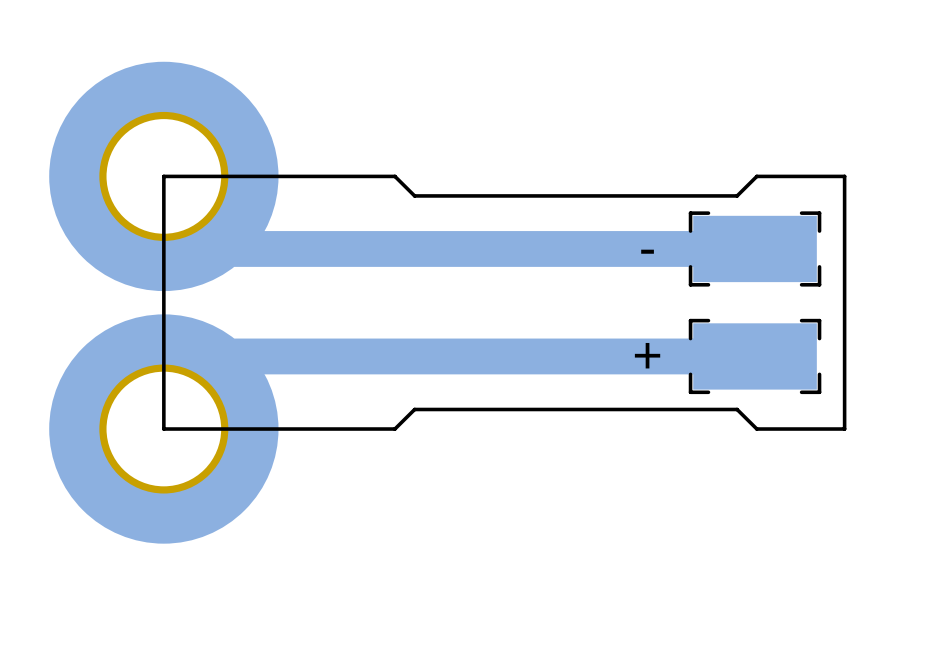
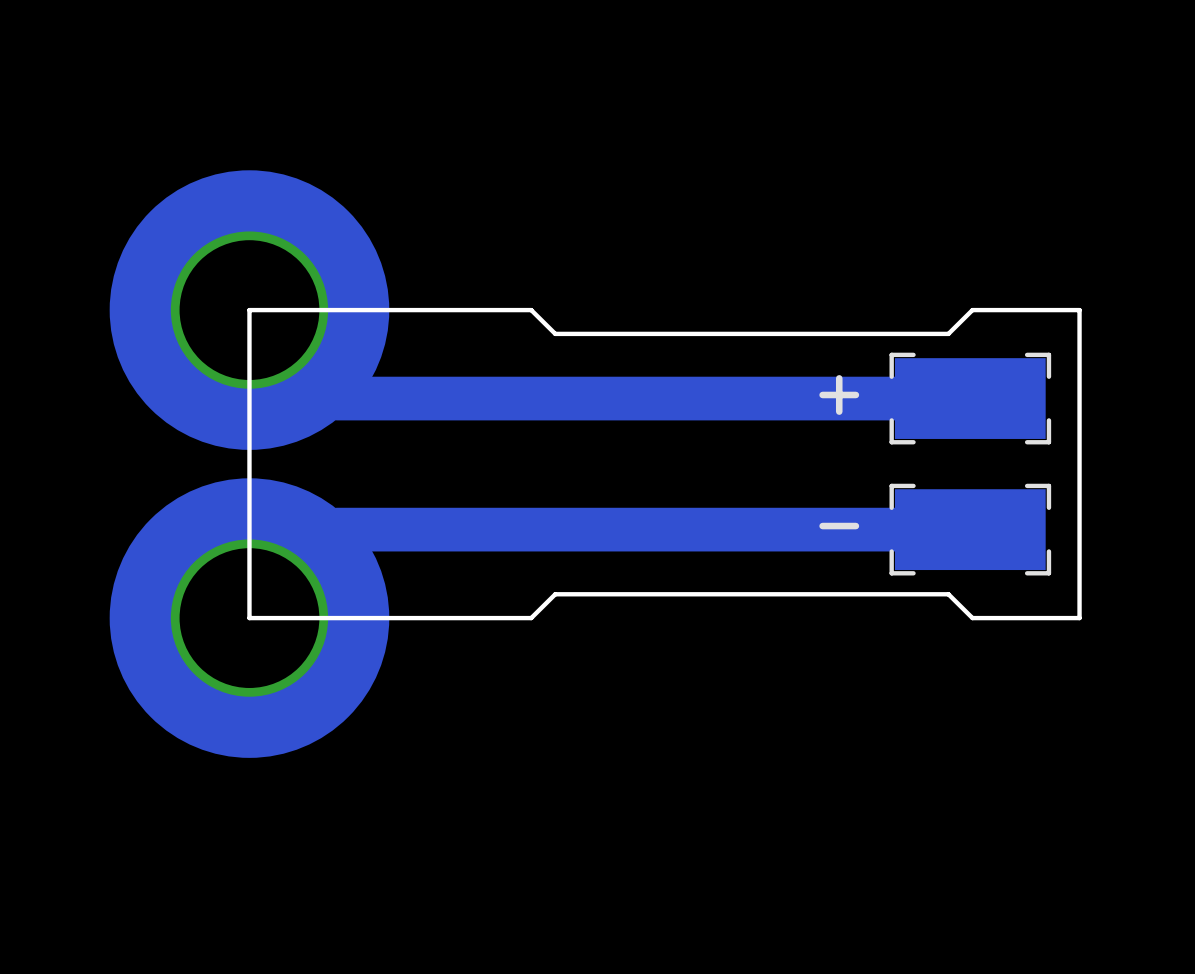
part text: none -> + (839, 394)
part name: - (647, 251) -> none
part text: none -> - (839, 526)
part name: + (647, 355) -> none

